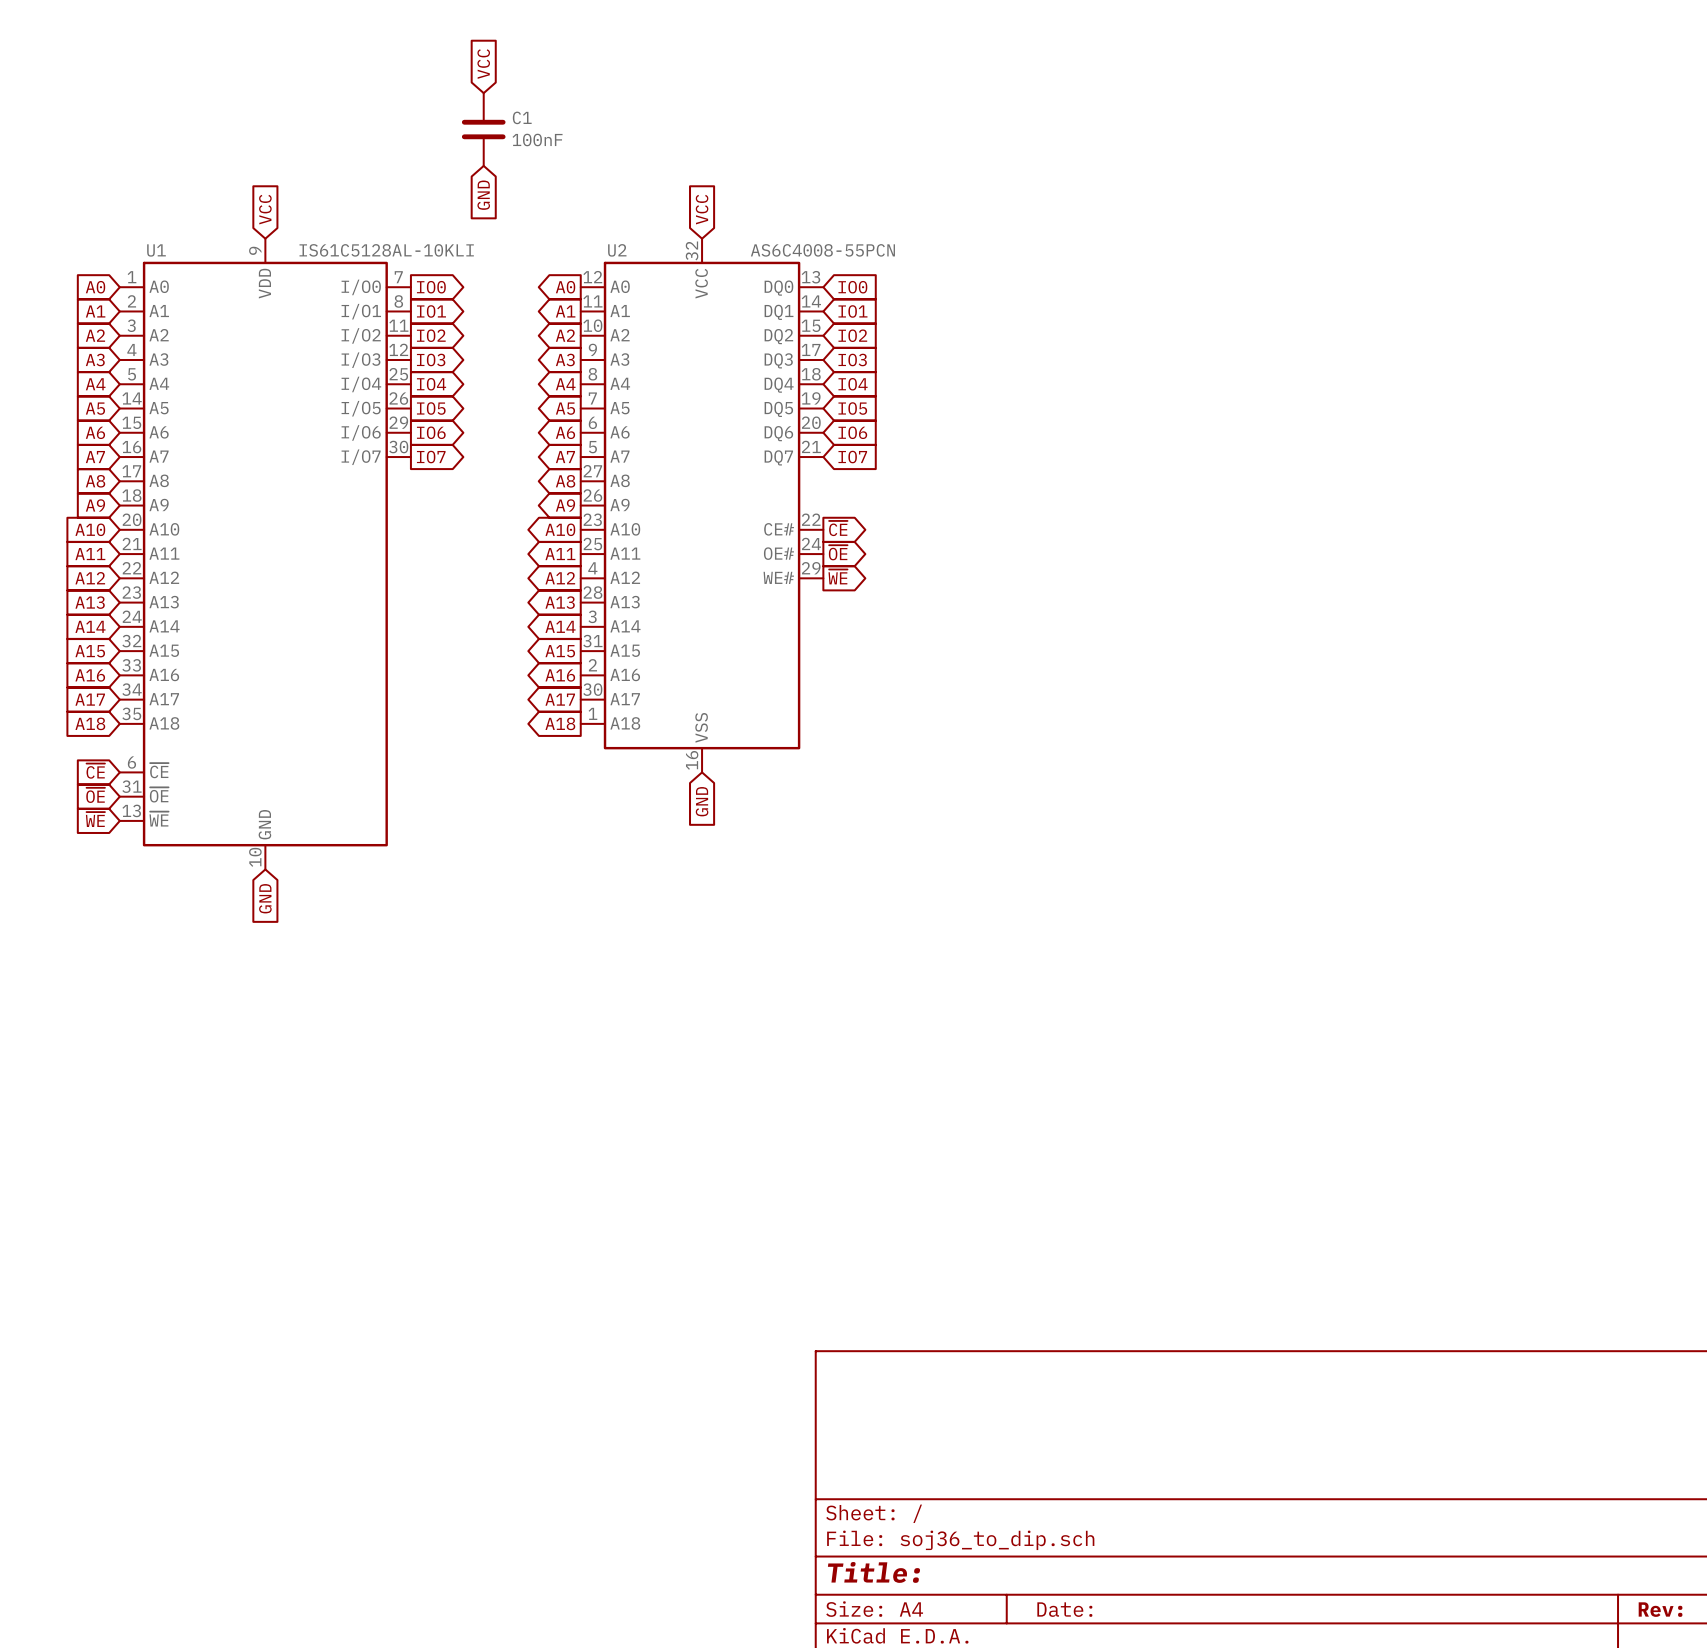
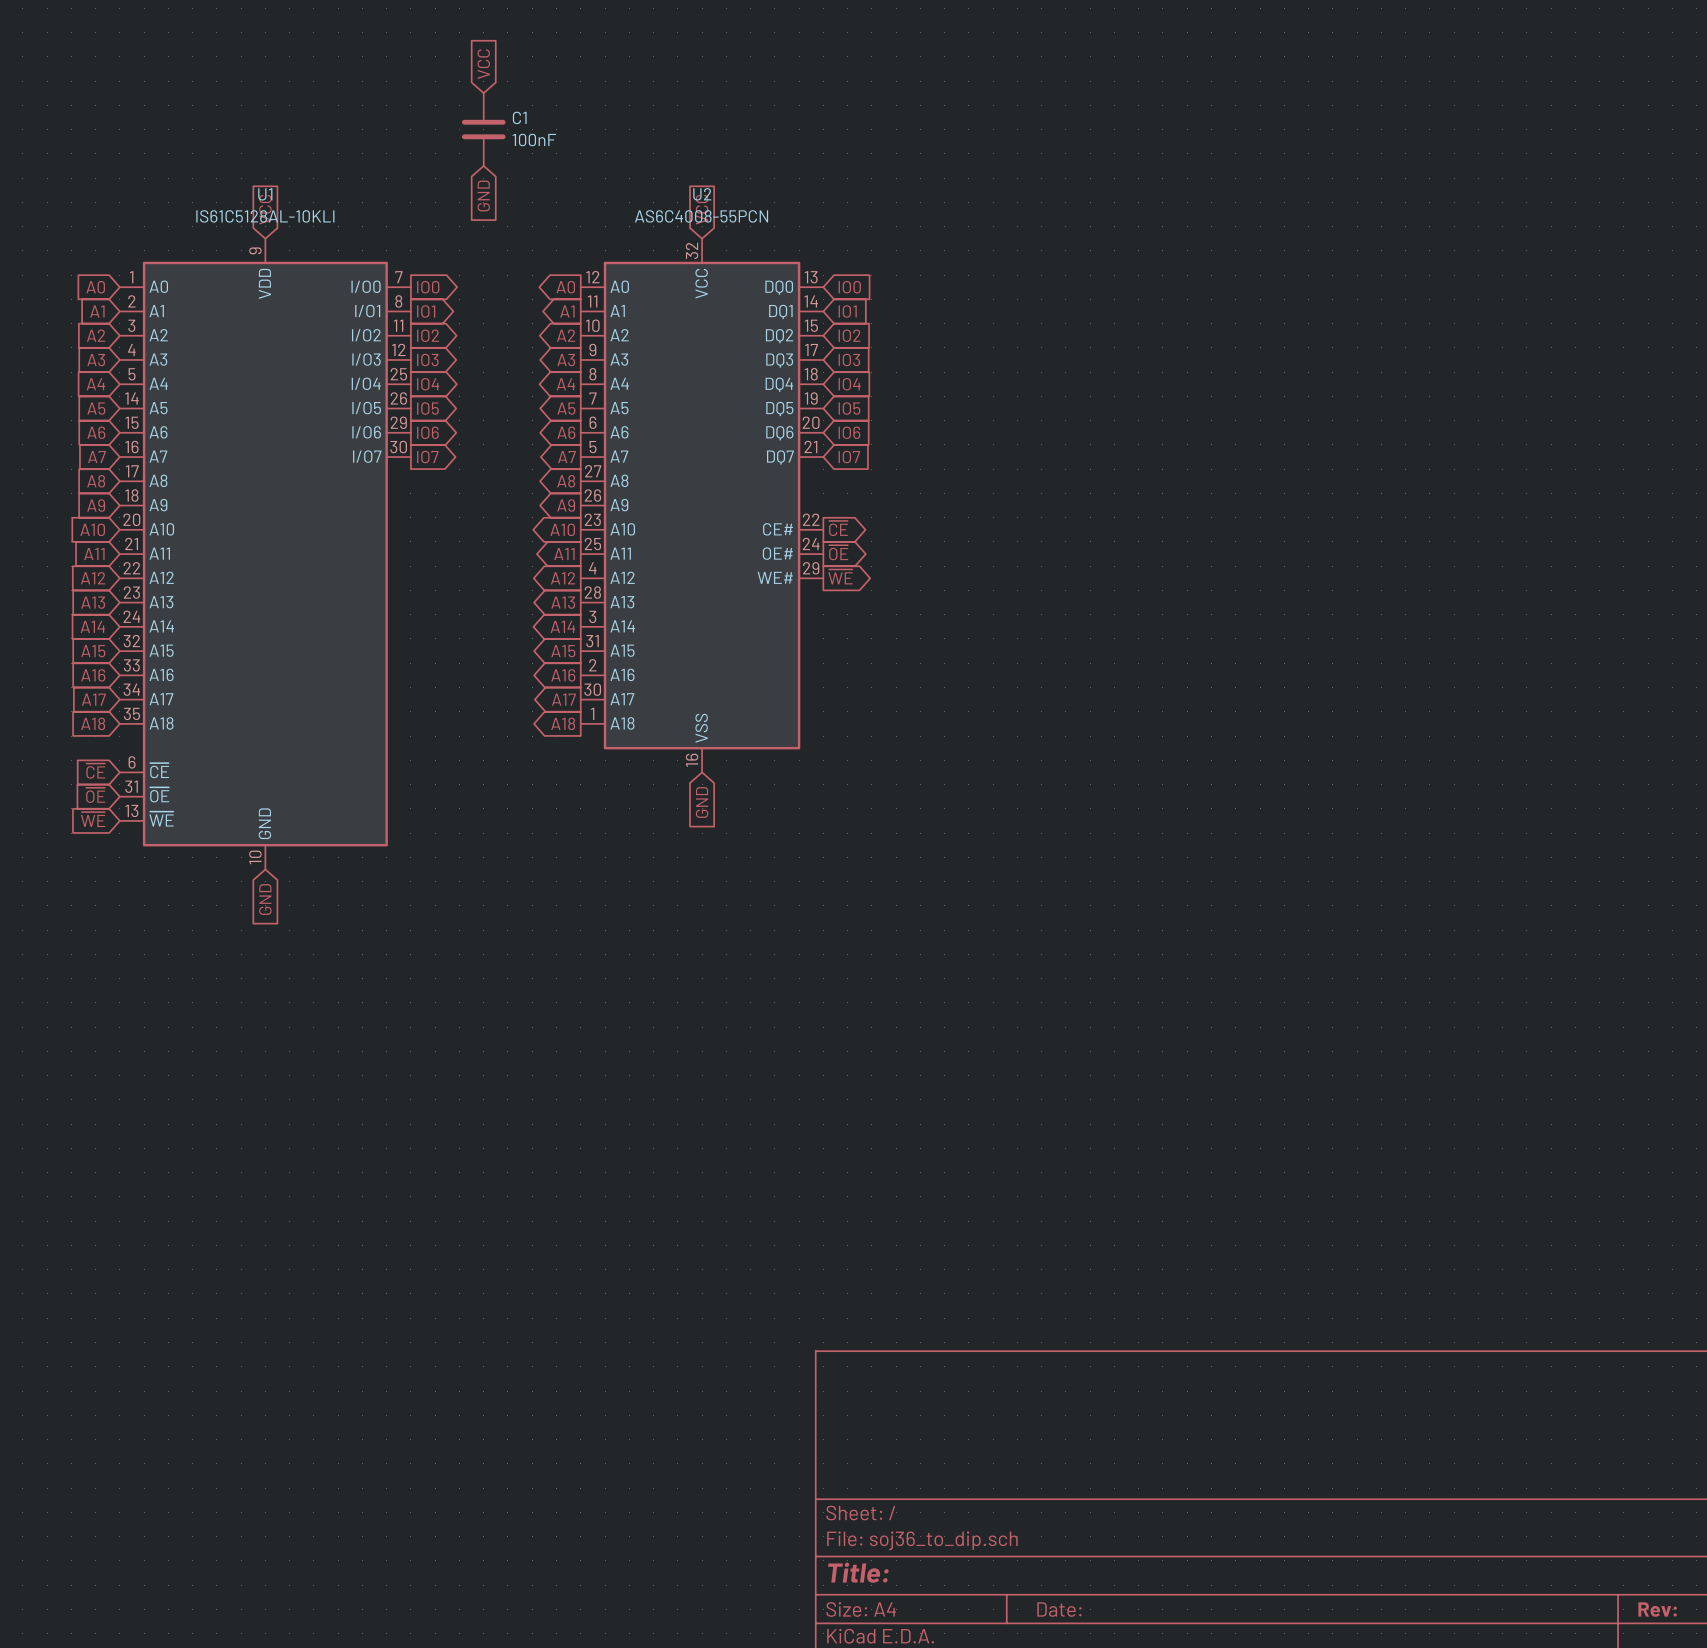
U1 name position: U1 (156, 250) -> U1 (265, 194)
U1 value position: IS61C5128AL-10KLI (386, 250) -> IS61C5128AL-10KLI (265, 216)
U2 name position: U2 (617, 250) -> U2 (702, 194)
U2 value position: AS6C4008-55PCN (822, 250) -> AS6C4008-55PCN (701, 216)

